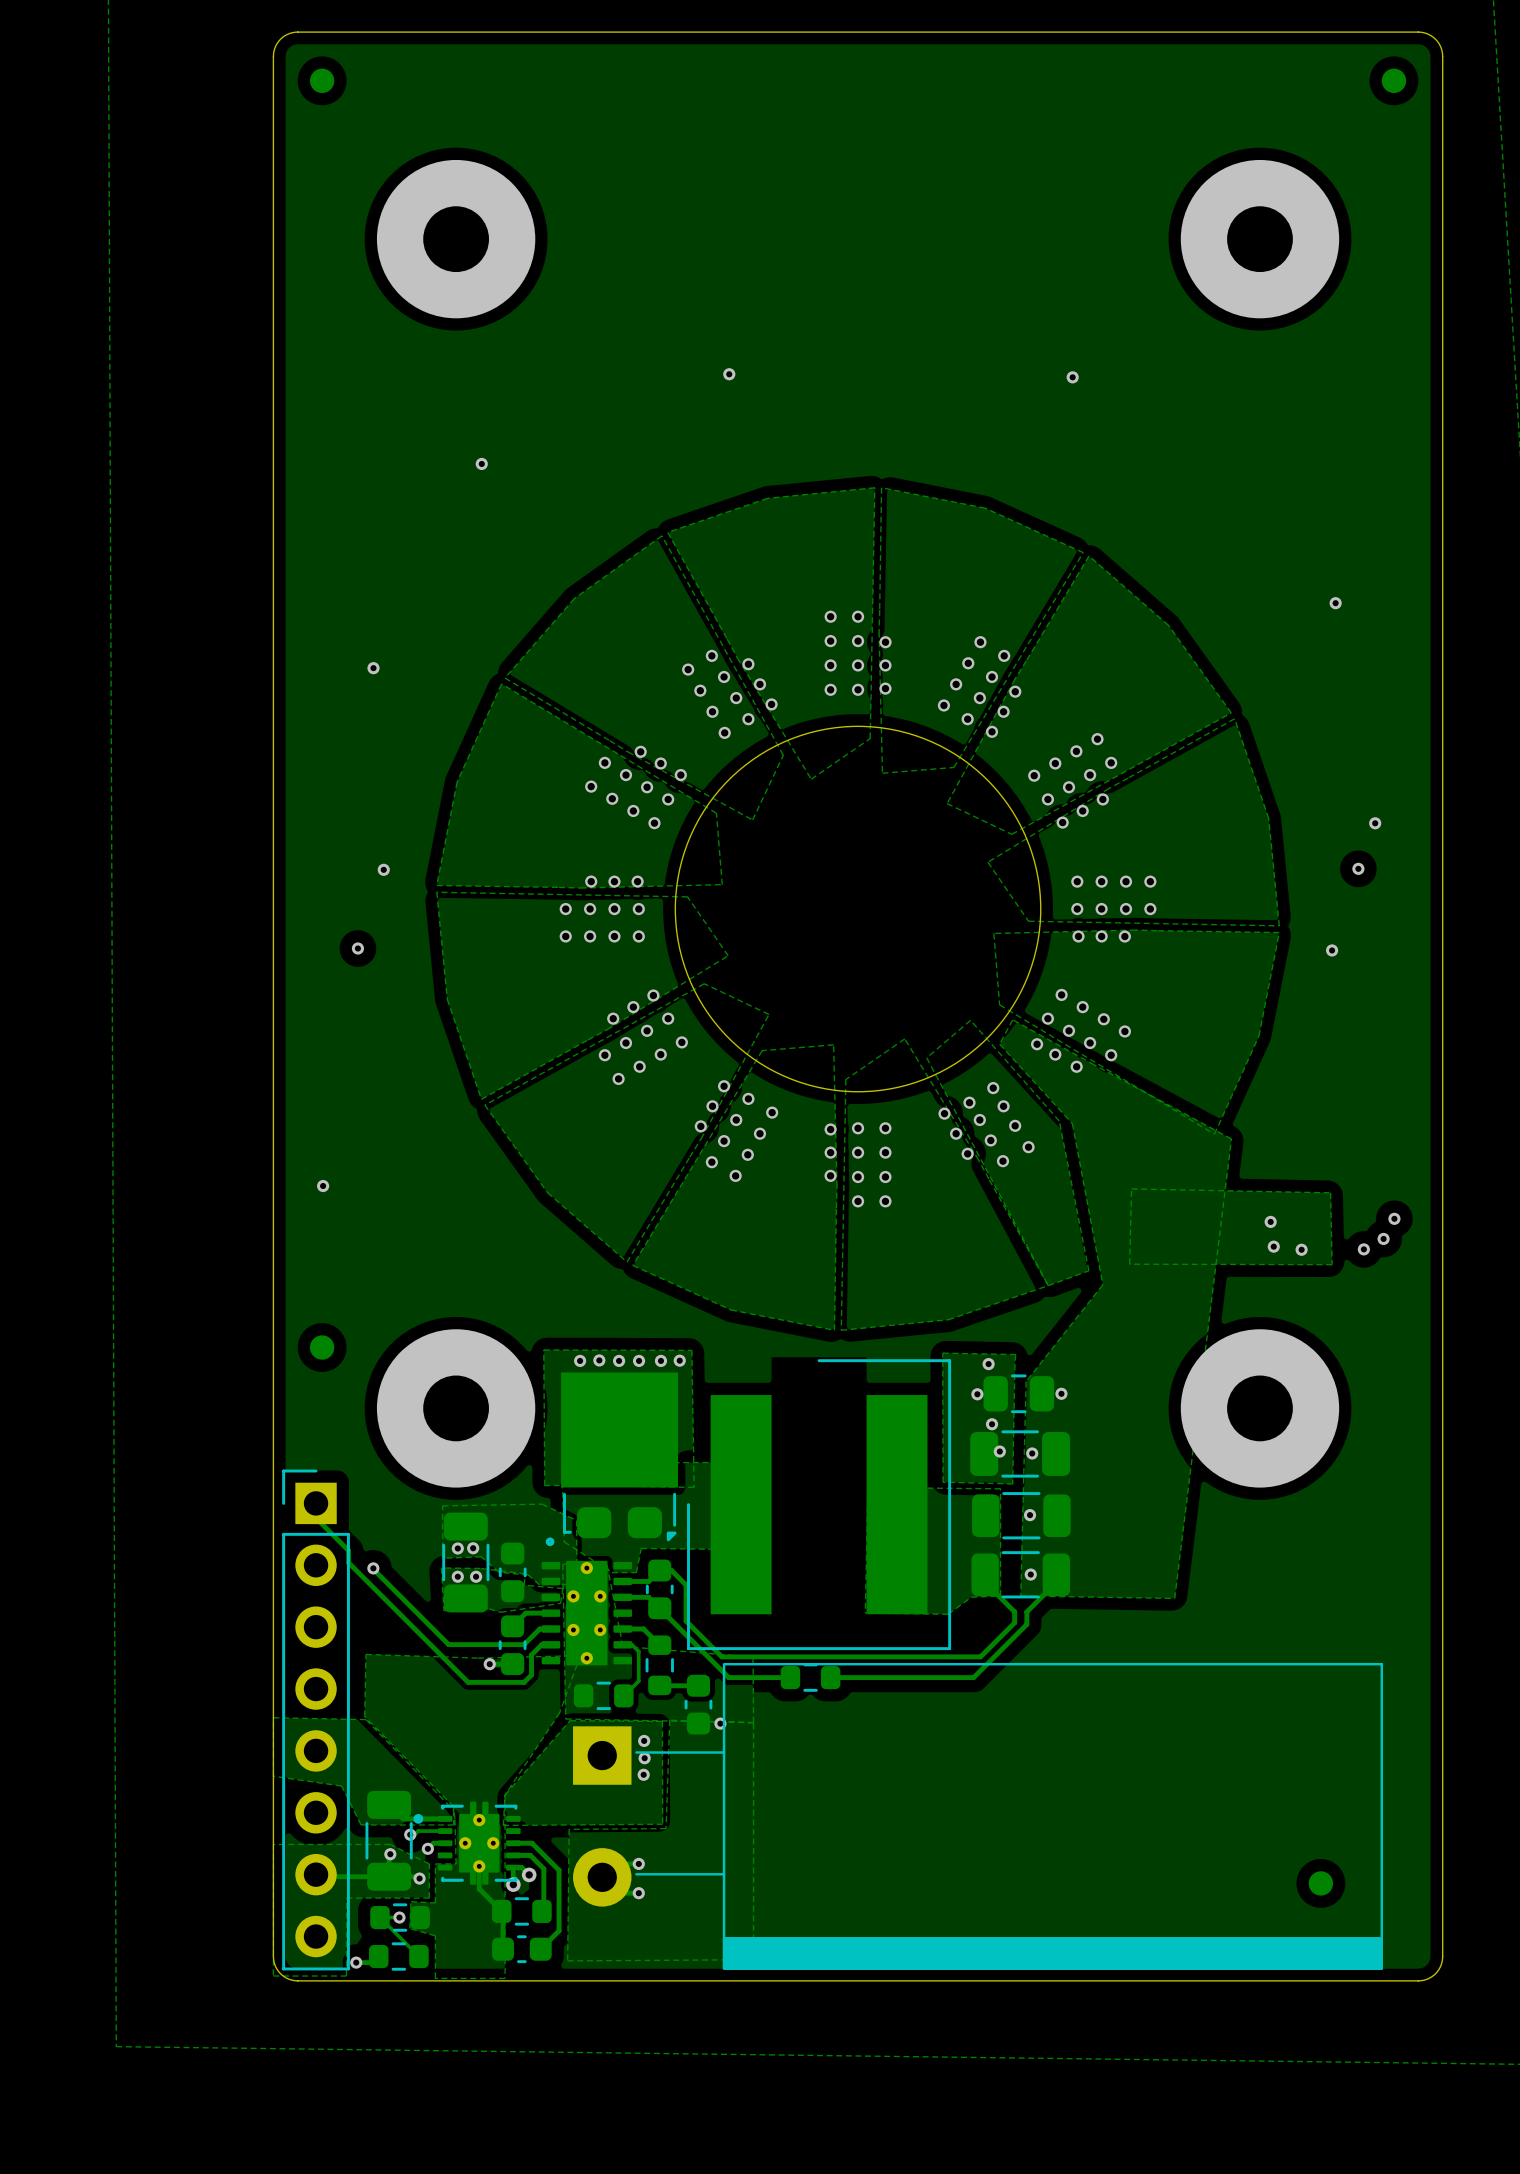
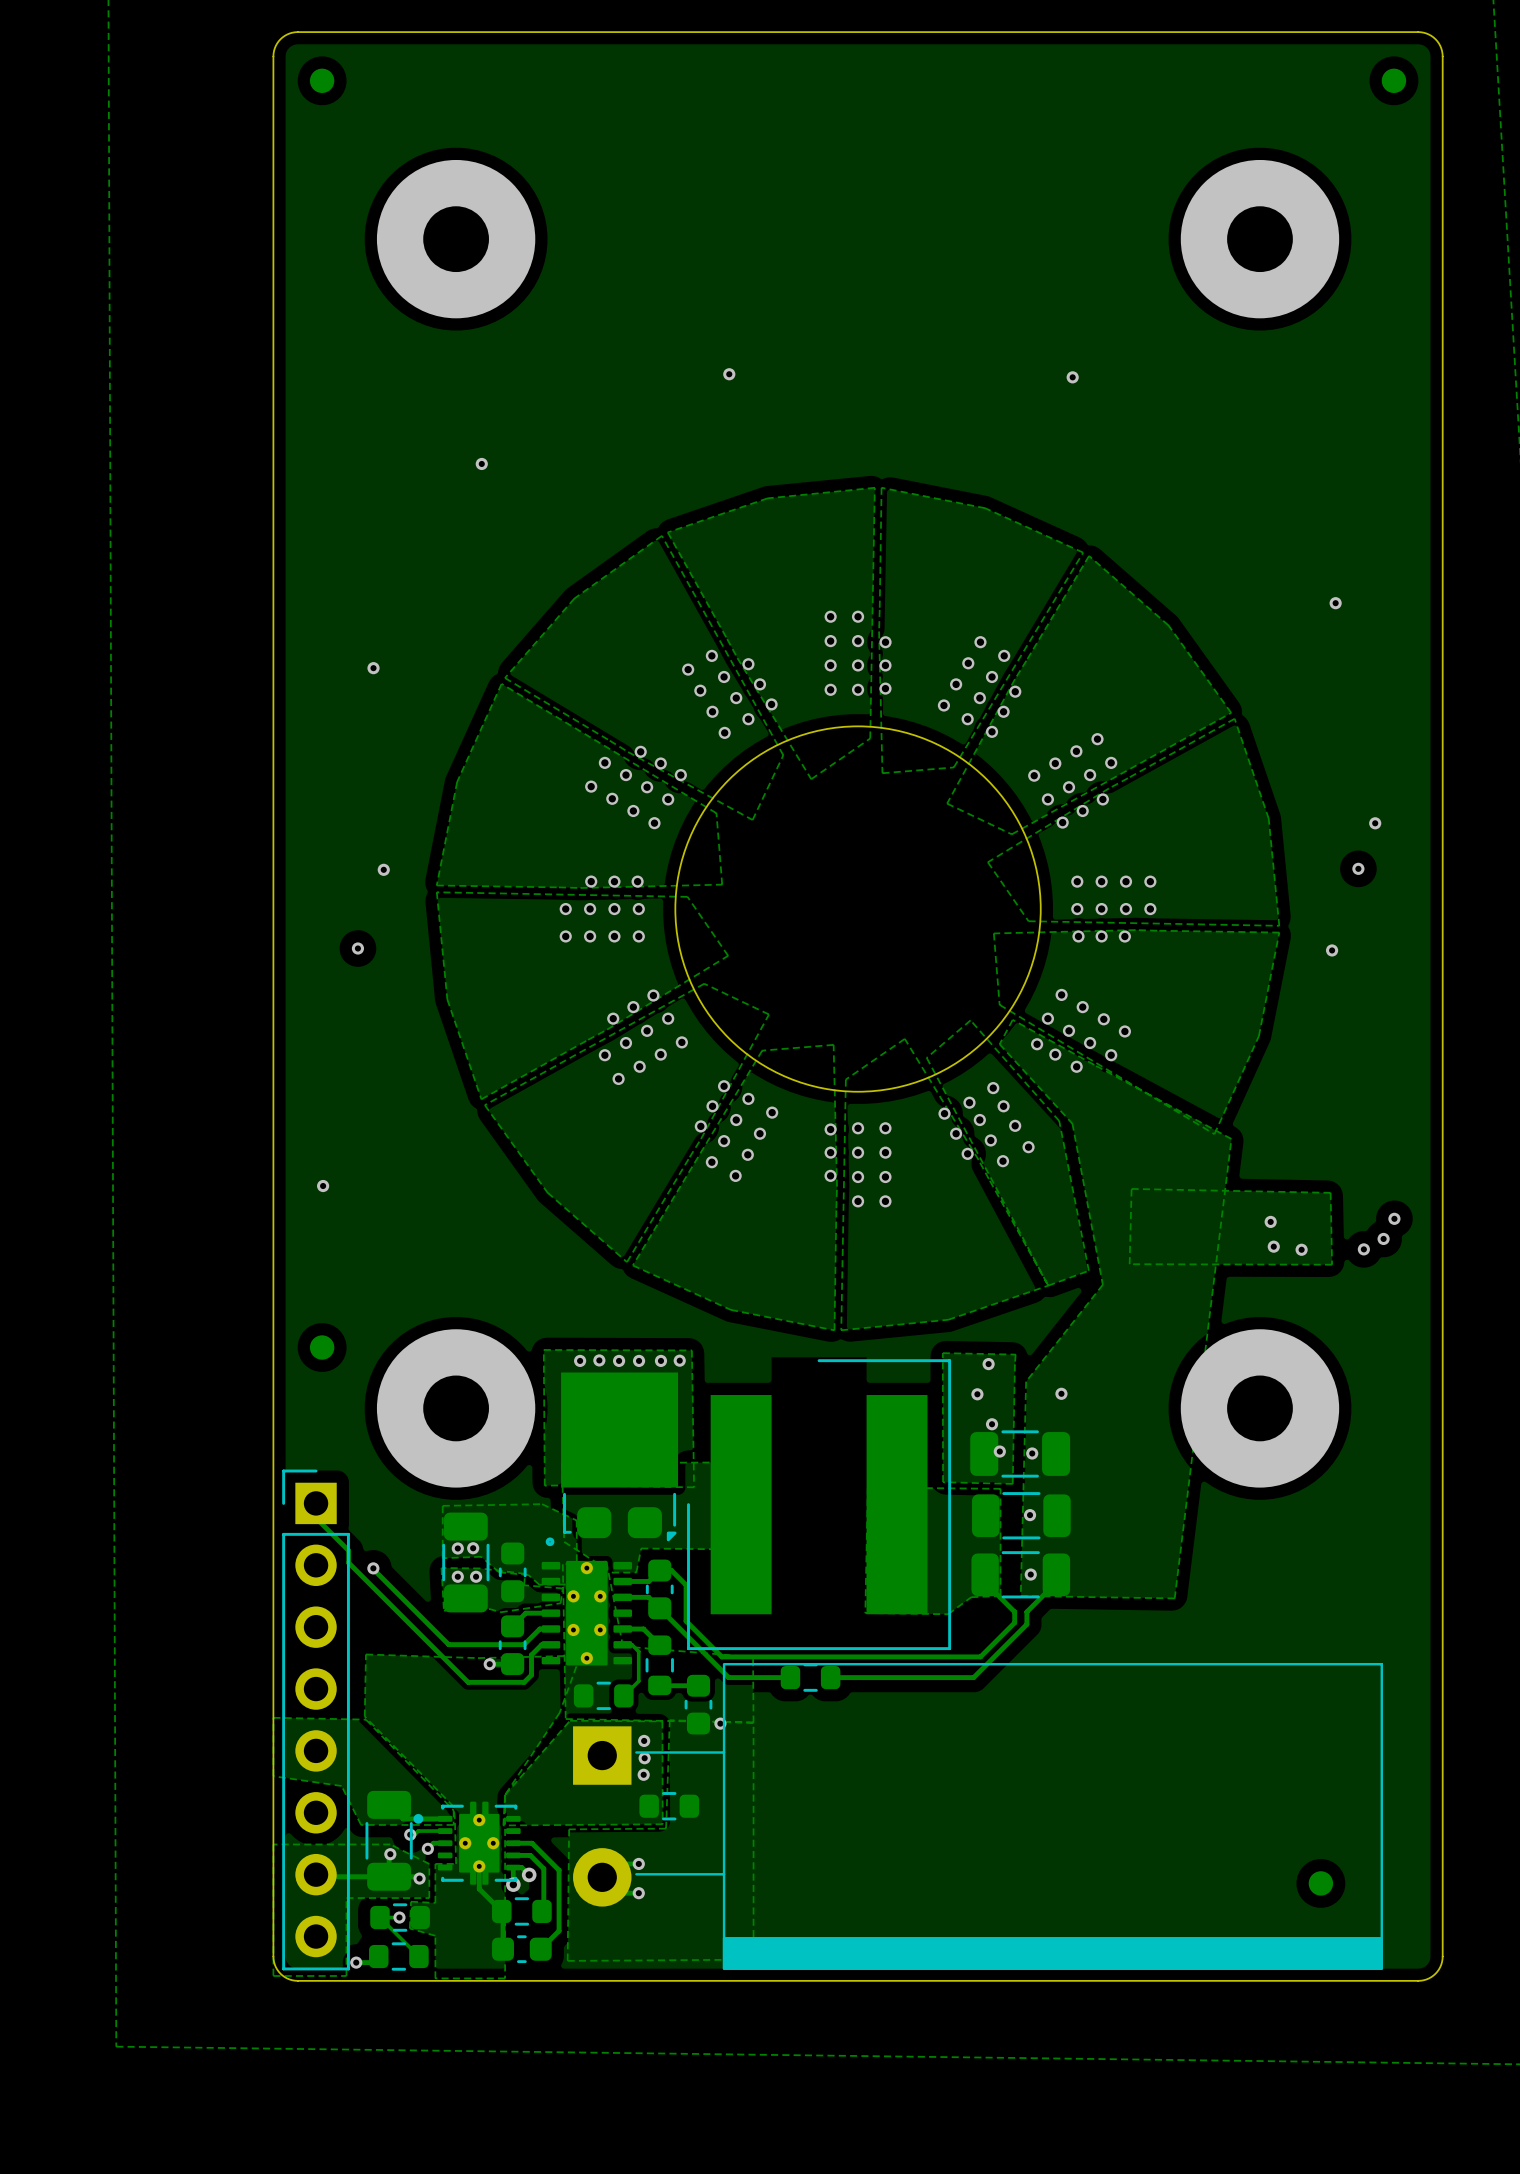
part: (1018, 1393) -> none
part: none -> (669, 1806)

